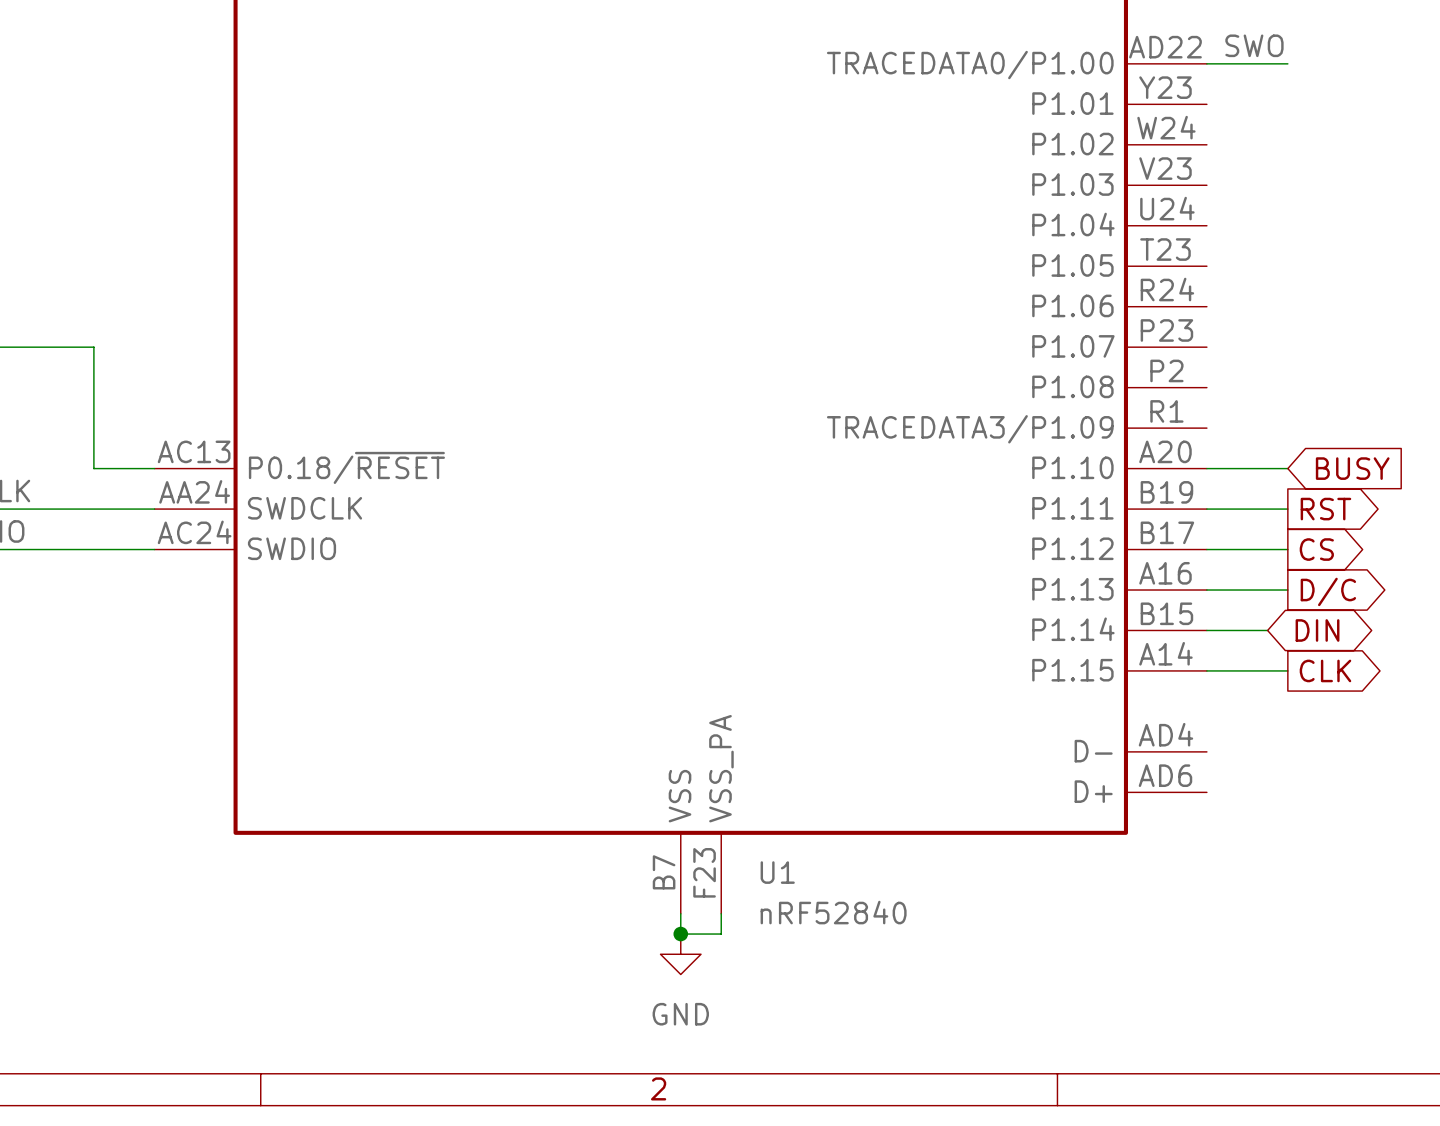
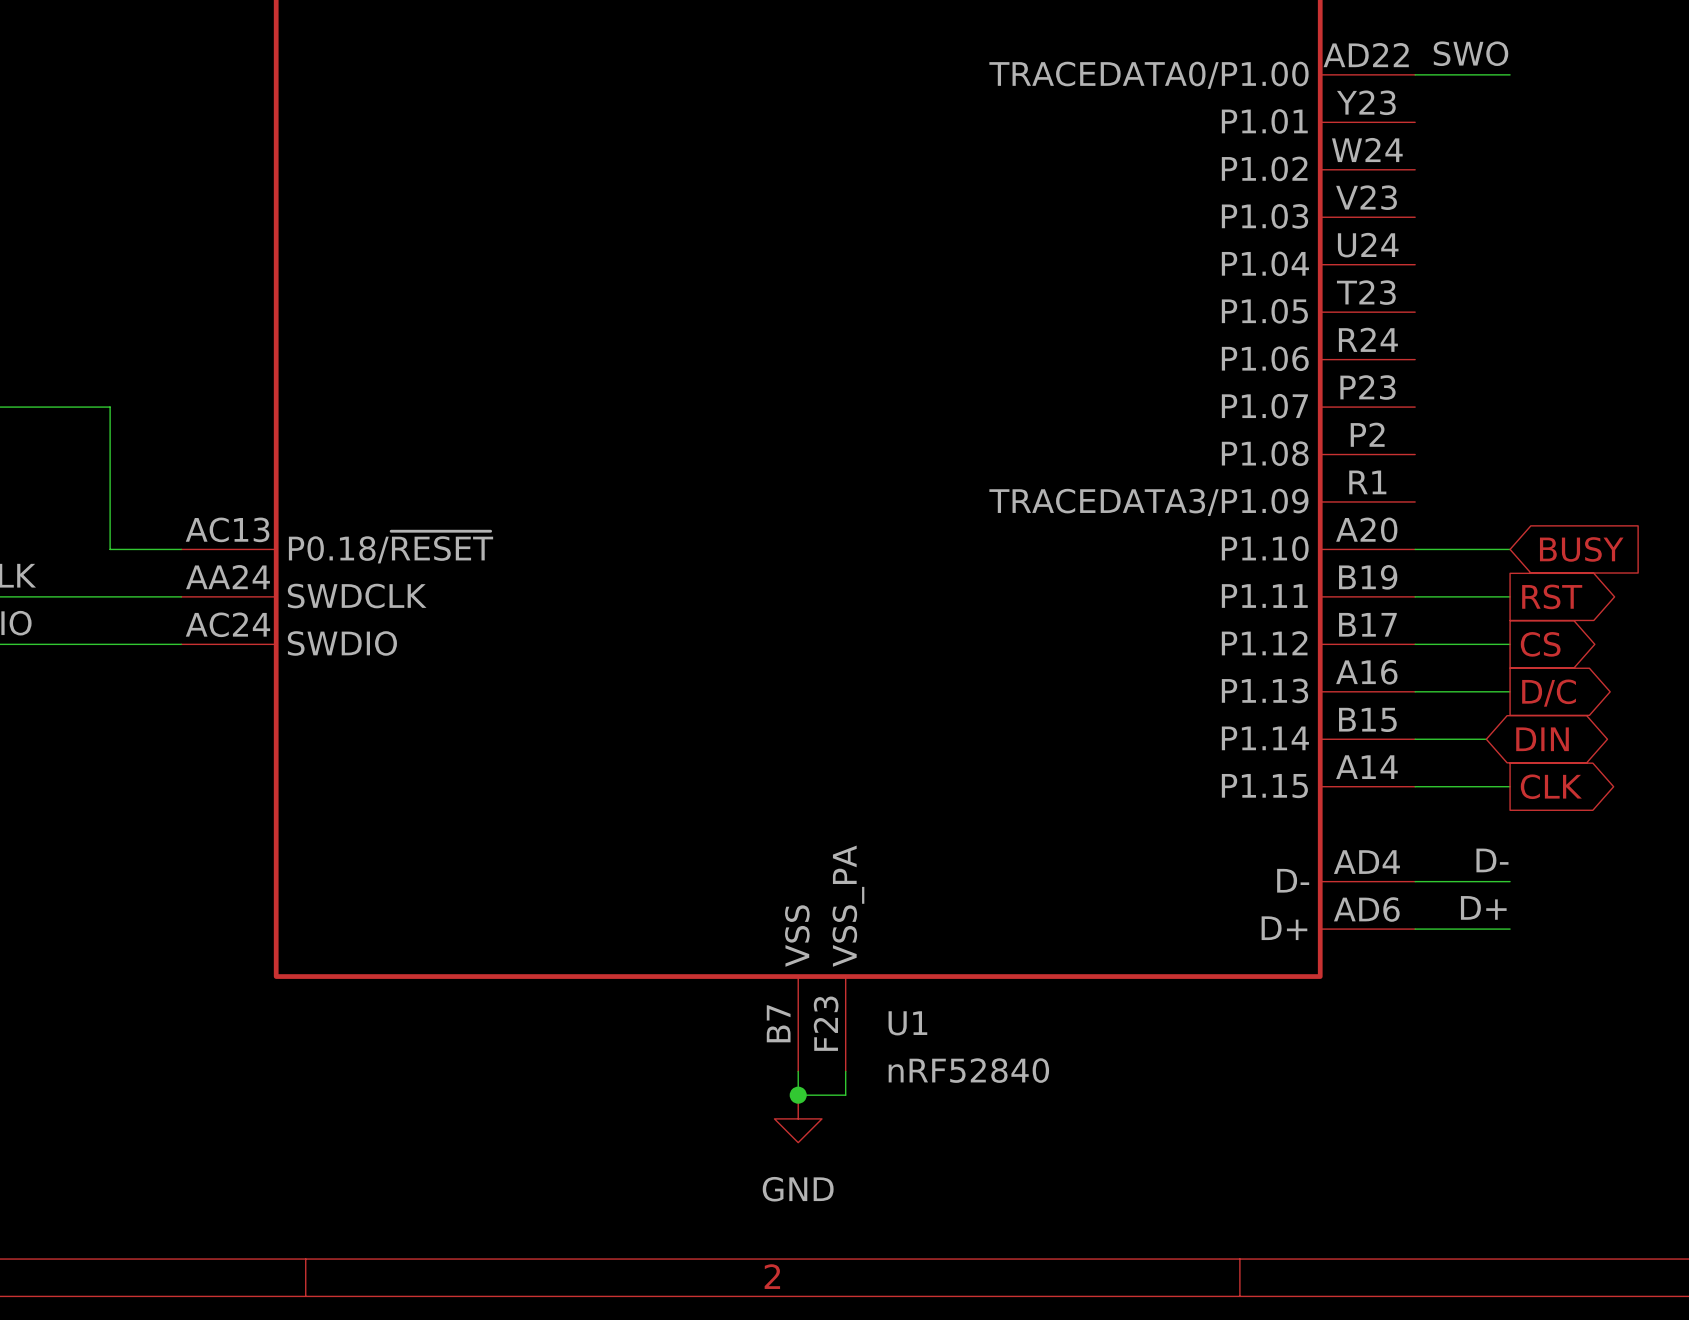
label: none -> D- (1492, 860)
wire: none -> (1415, 881) (1510, 881)
label: none -> D+ (1483, 907)
wire: none -> (1415, 929) (1510, 929)

